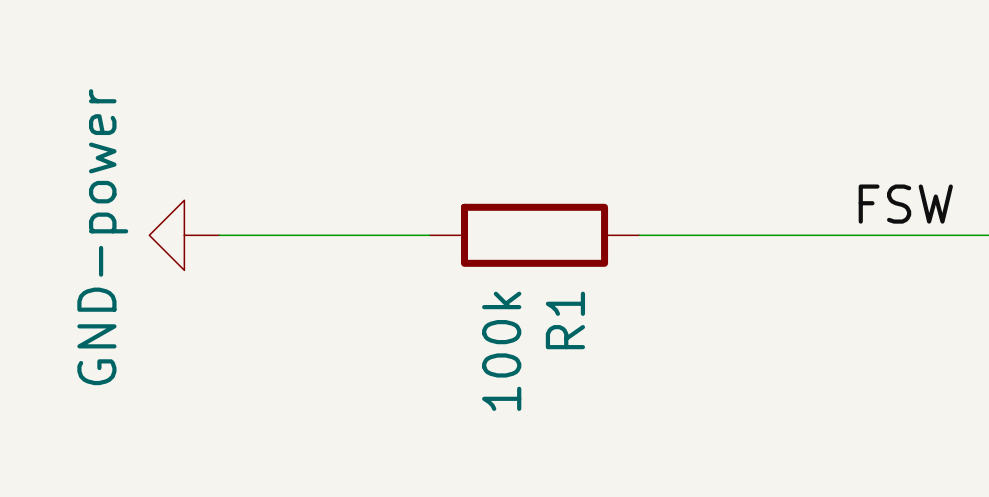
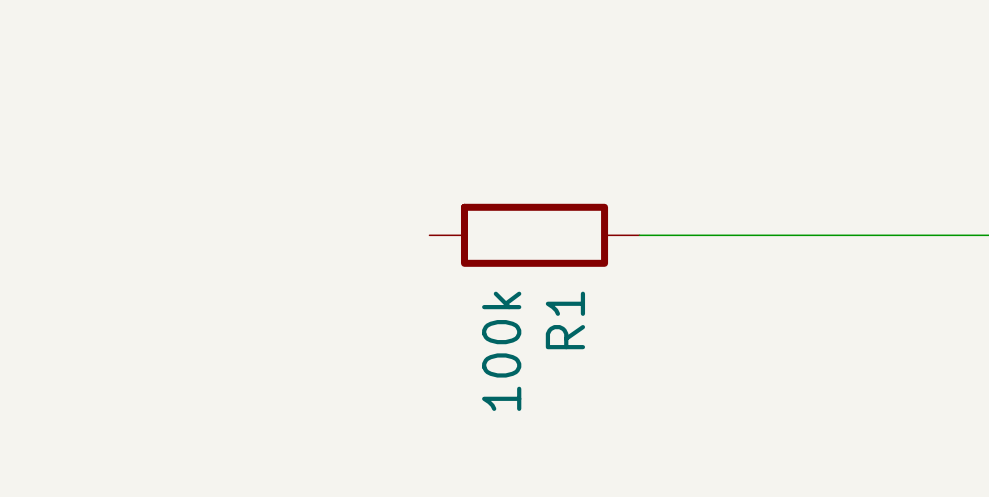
label: FSW (905, 204) -> none
power symbol: GND-power (184, 235) -> none
wire: (219, 235) (429, 235) -> none

